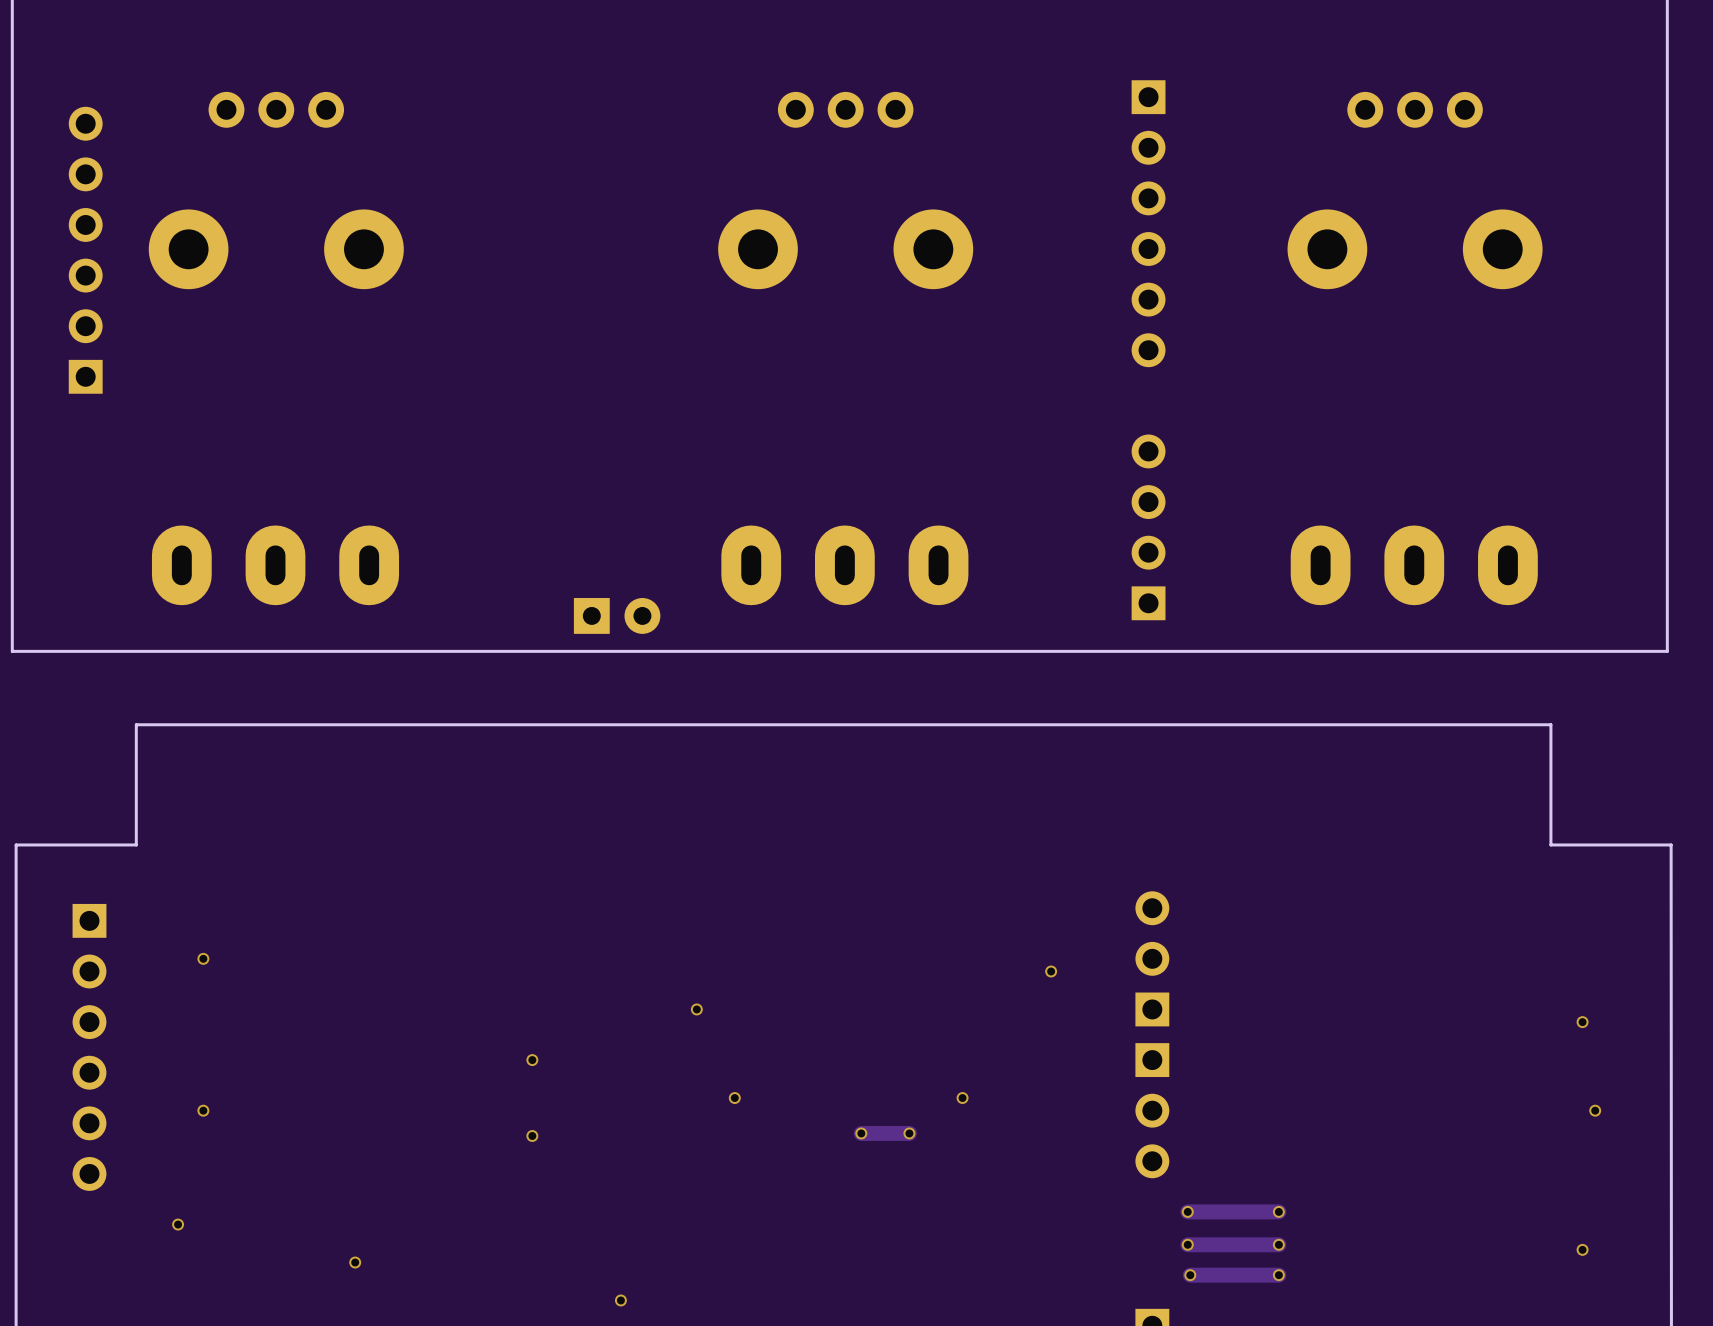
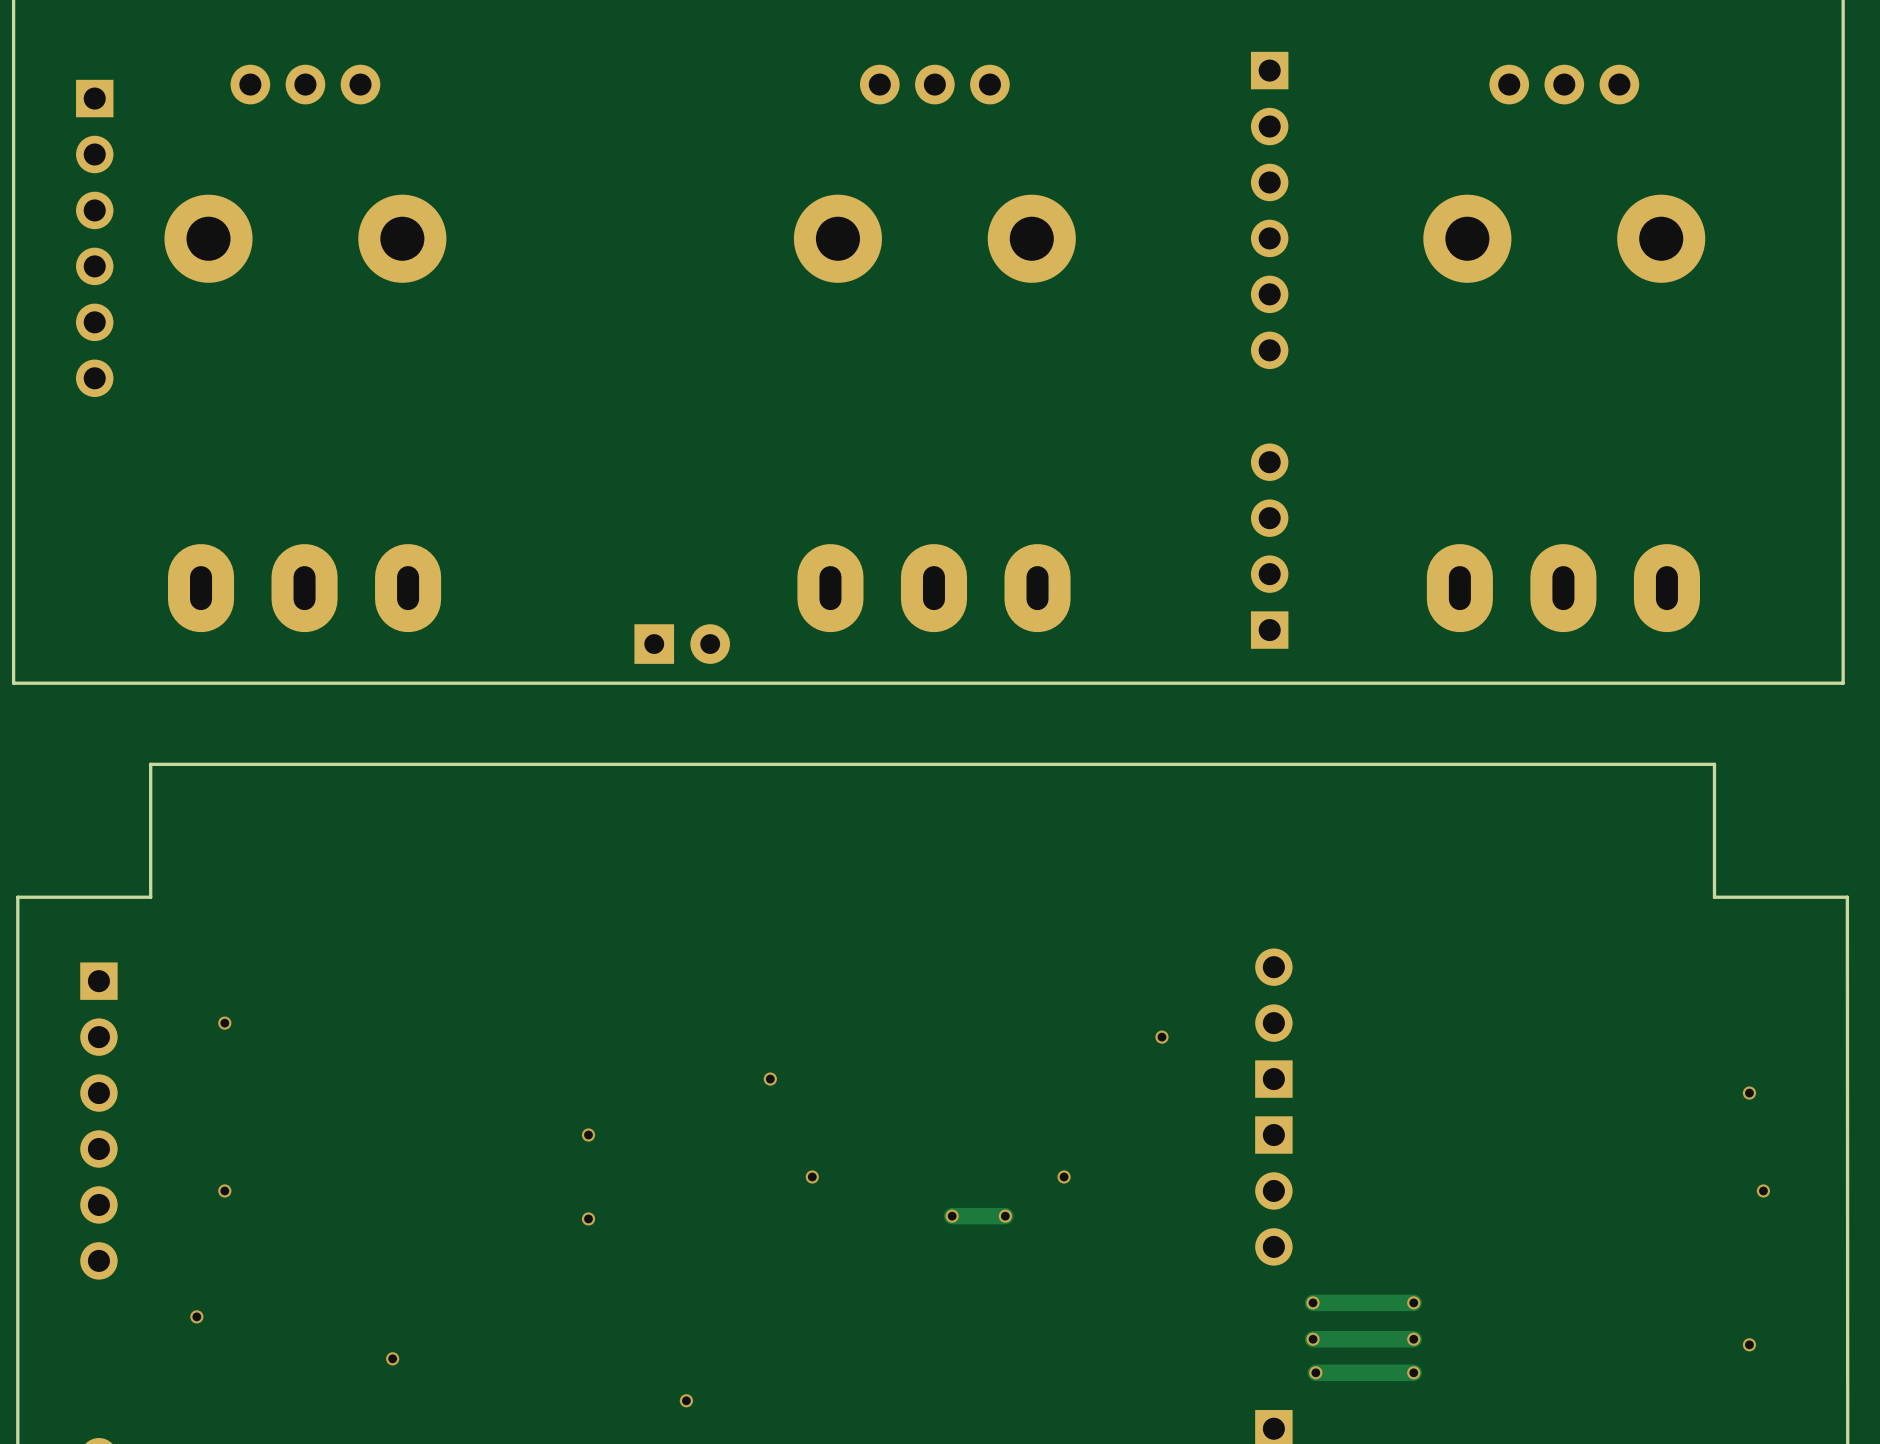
part rotation: 0° (85, 250) -> 180° (94, 238)

